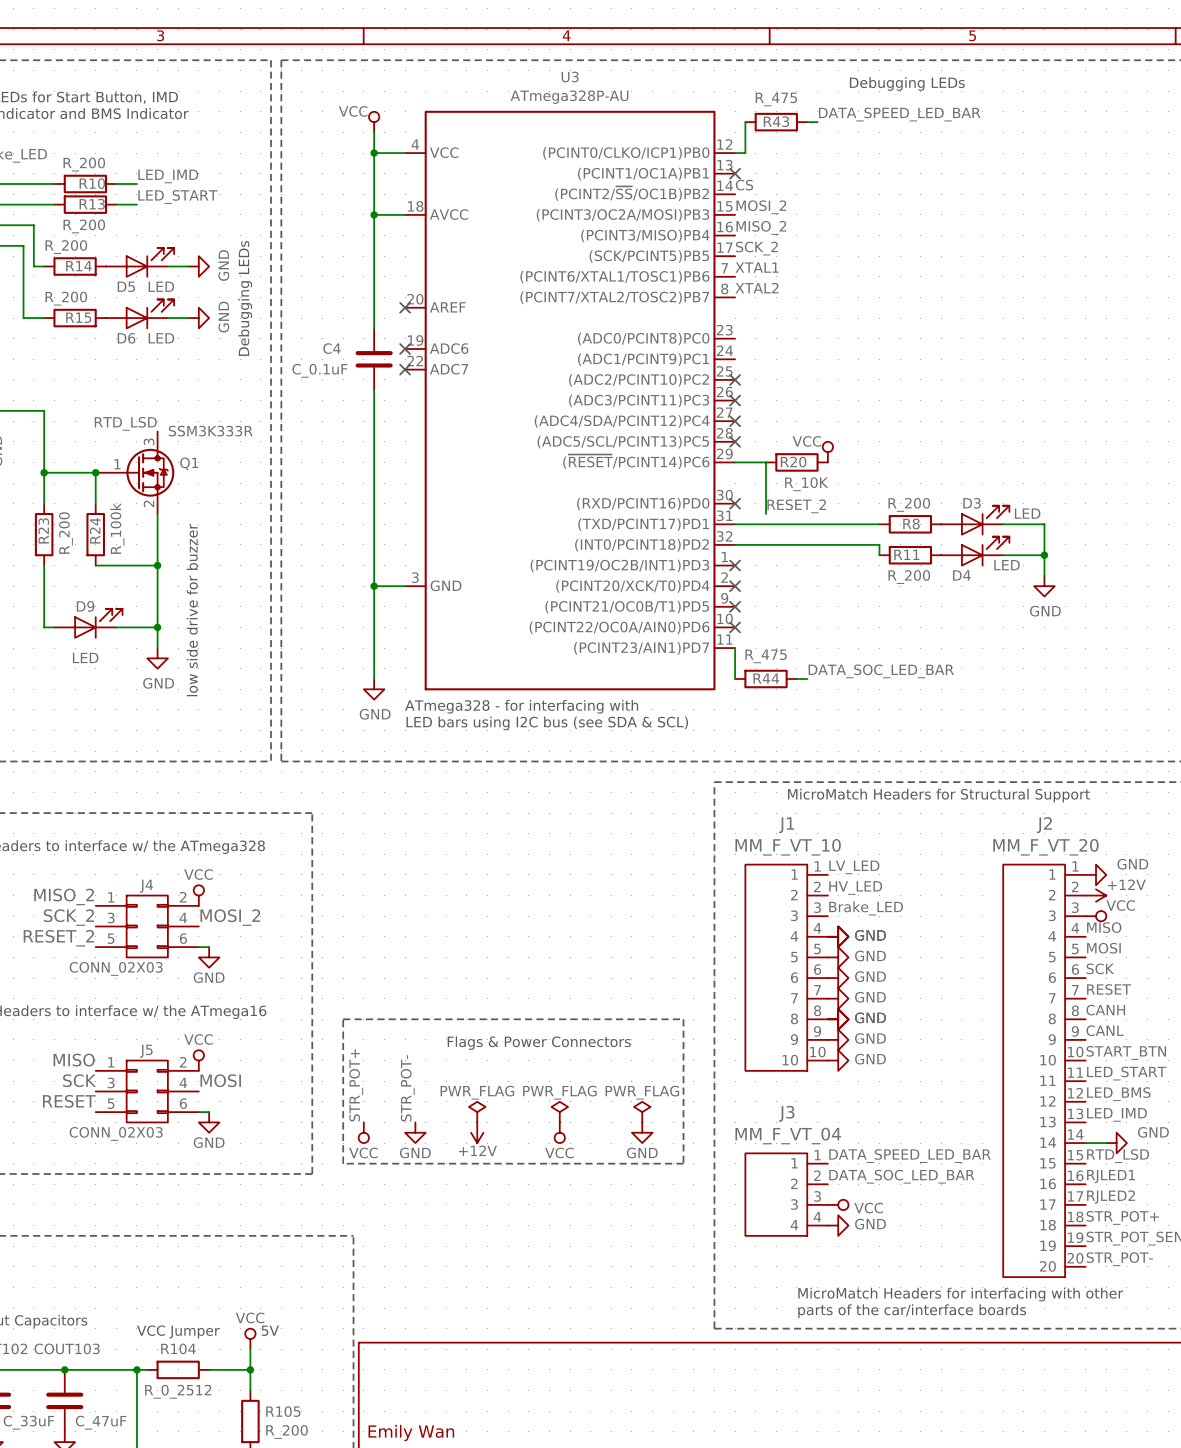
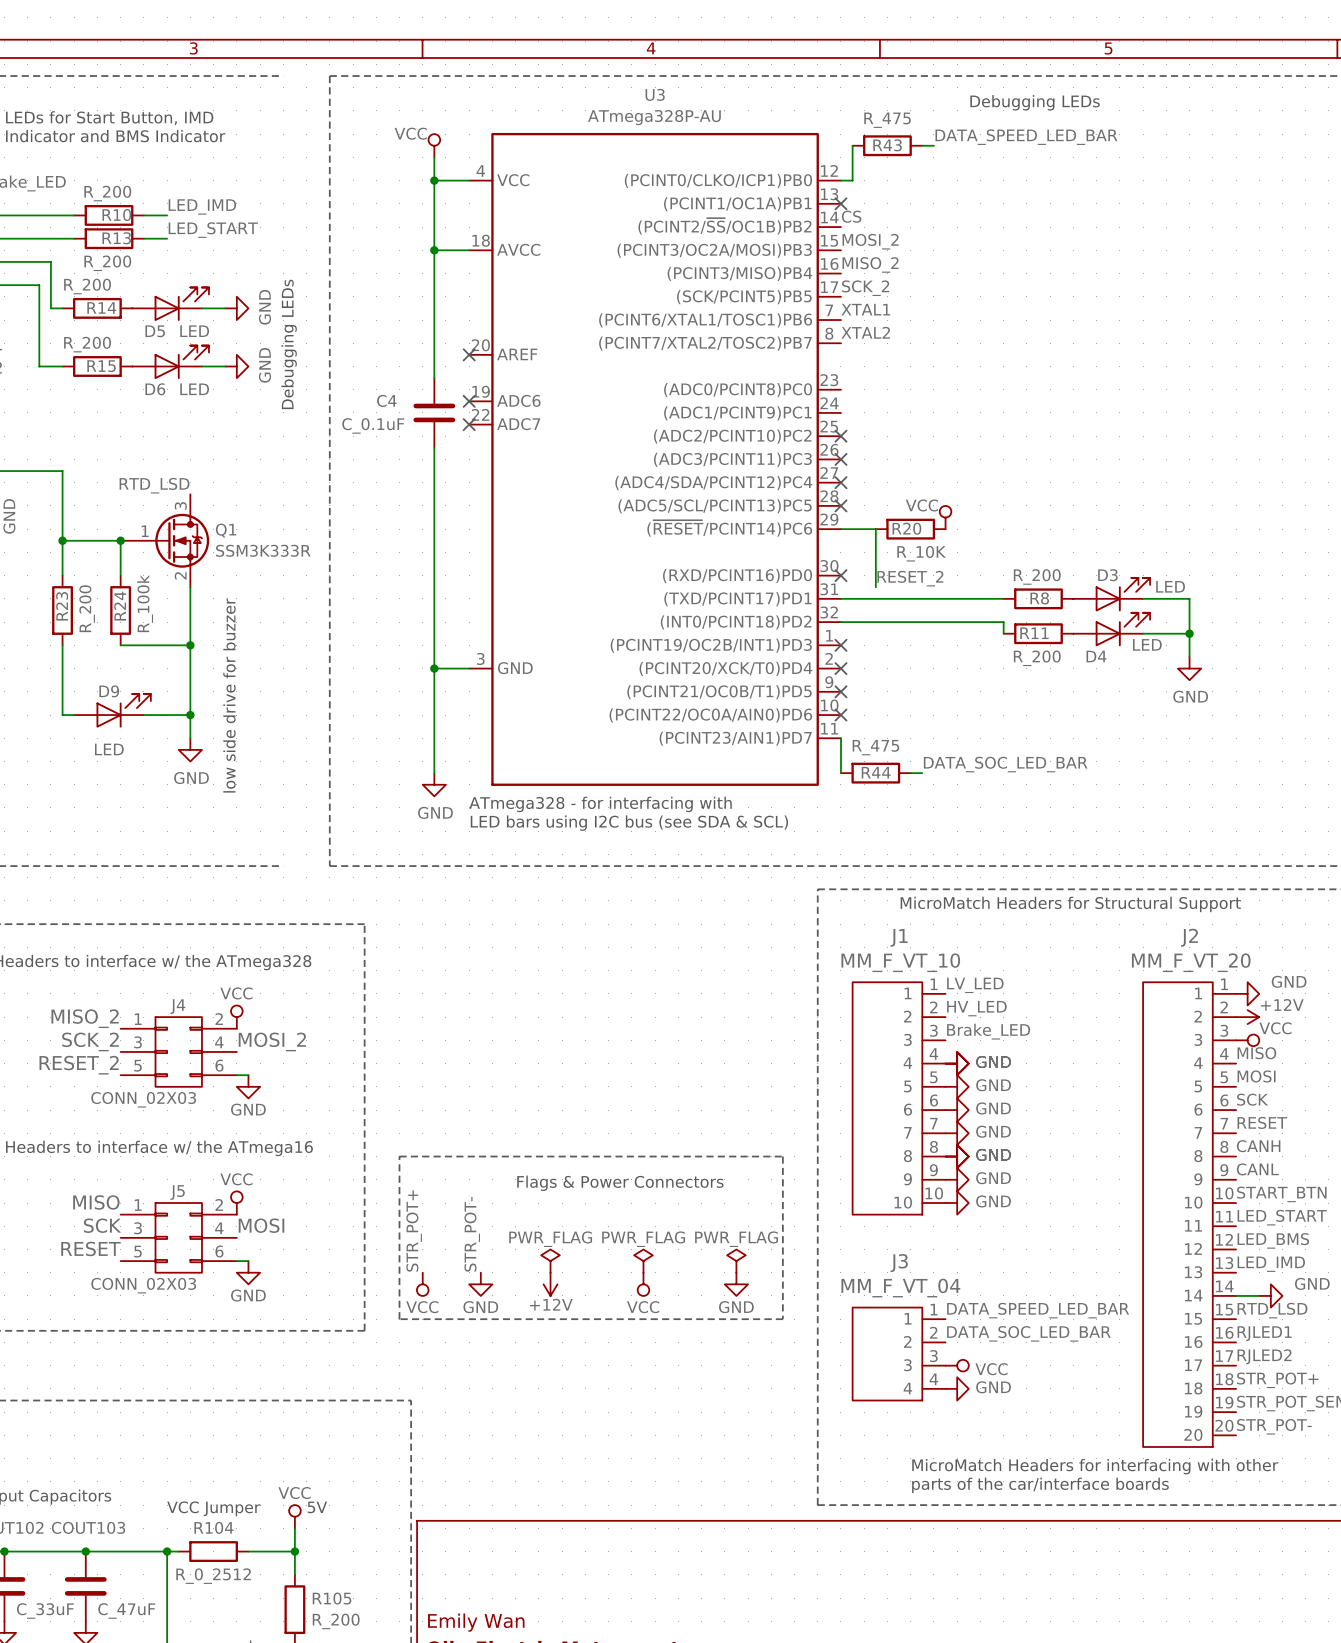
line: (240, 60) (271, 60) (271, 761) (240, 761) -> none
Q1 value position: SSM3K333R (210, 431) -> SSM3K333R (263, 550)

